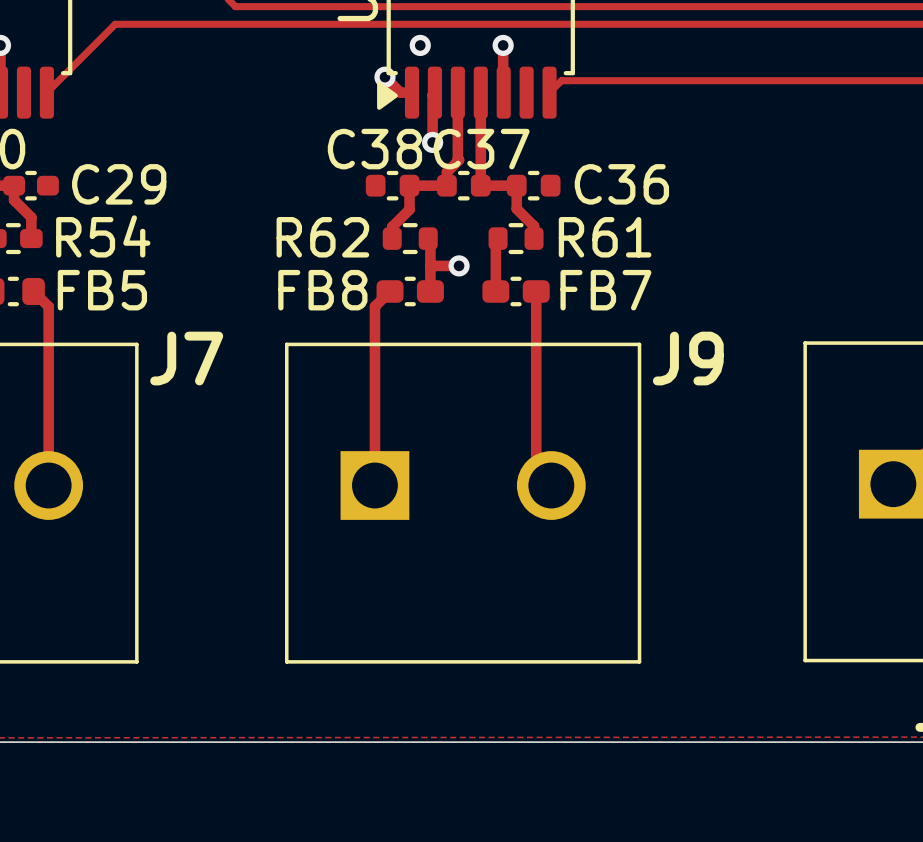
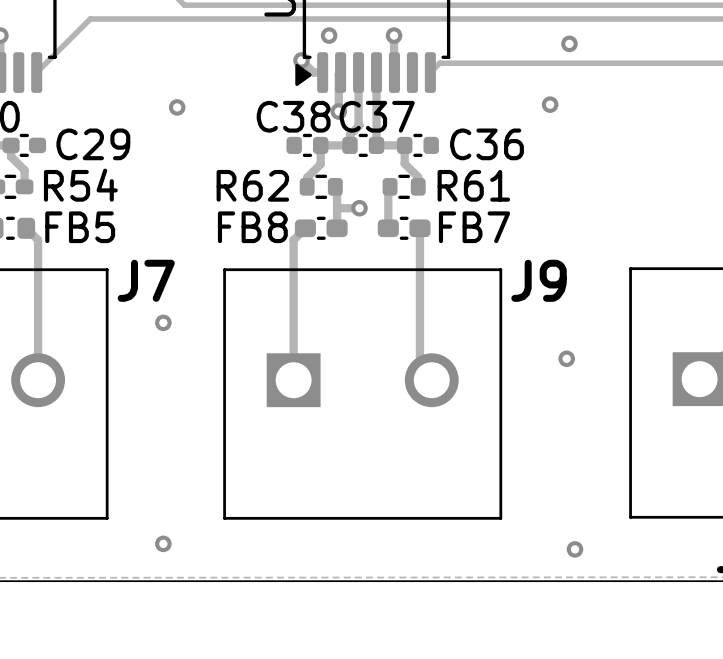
via: none -> (569, 43)
via: none -> (550, 104)
via: none -> (177, 107)
via: none -> (163, 322)
via: none -> (566, 358)
via: none -> (163, 543)
via: none -> (574, 549)

